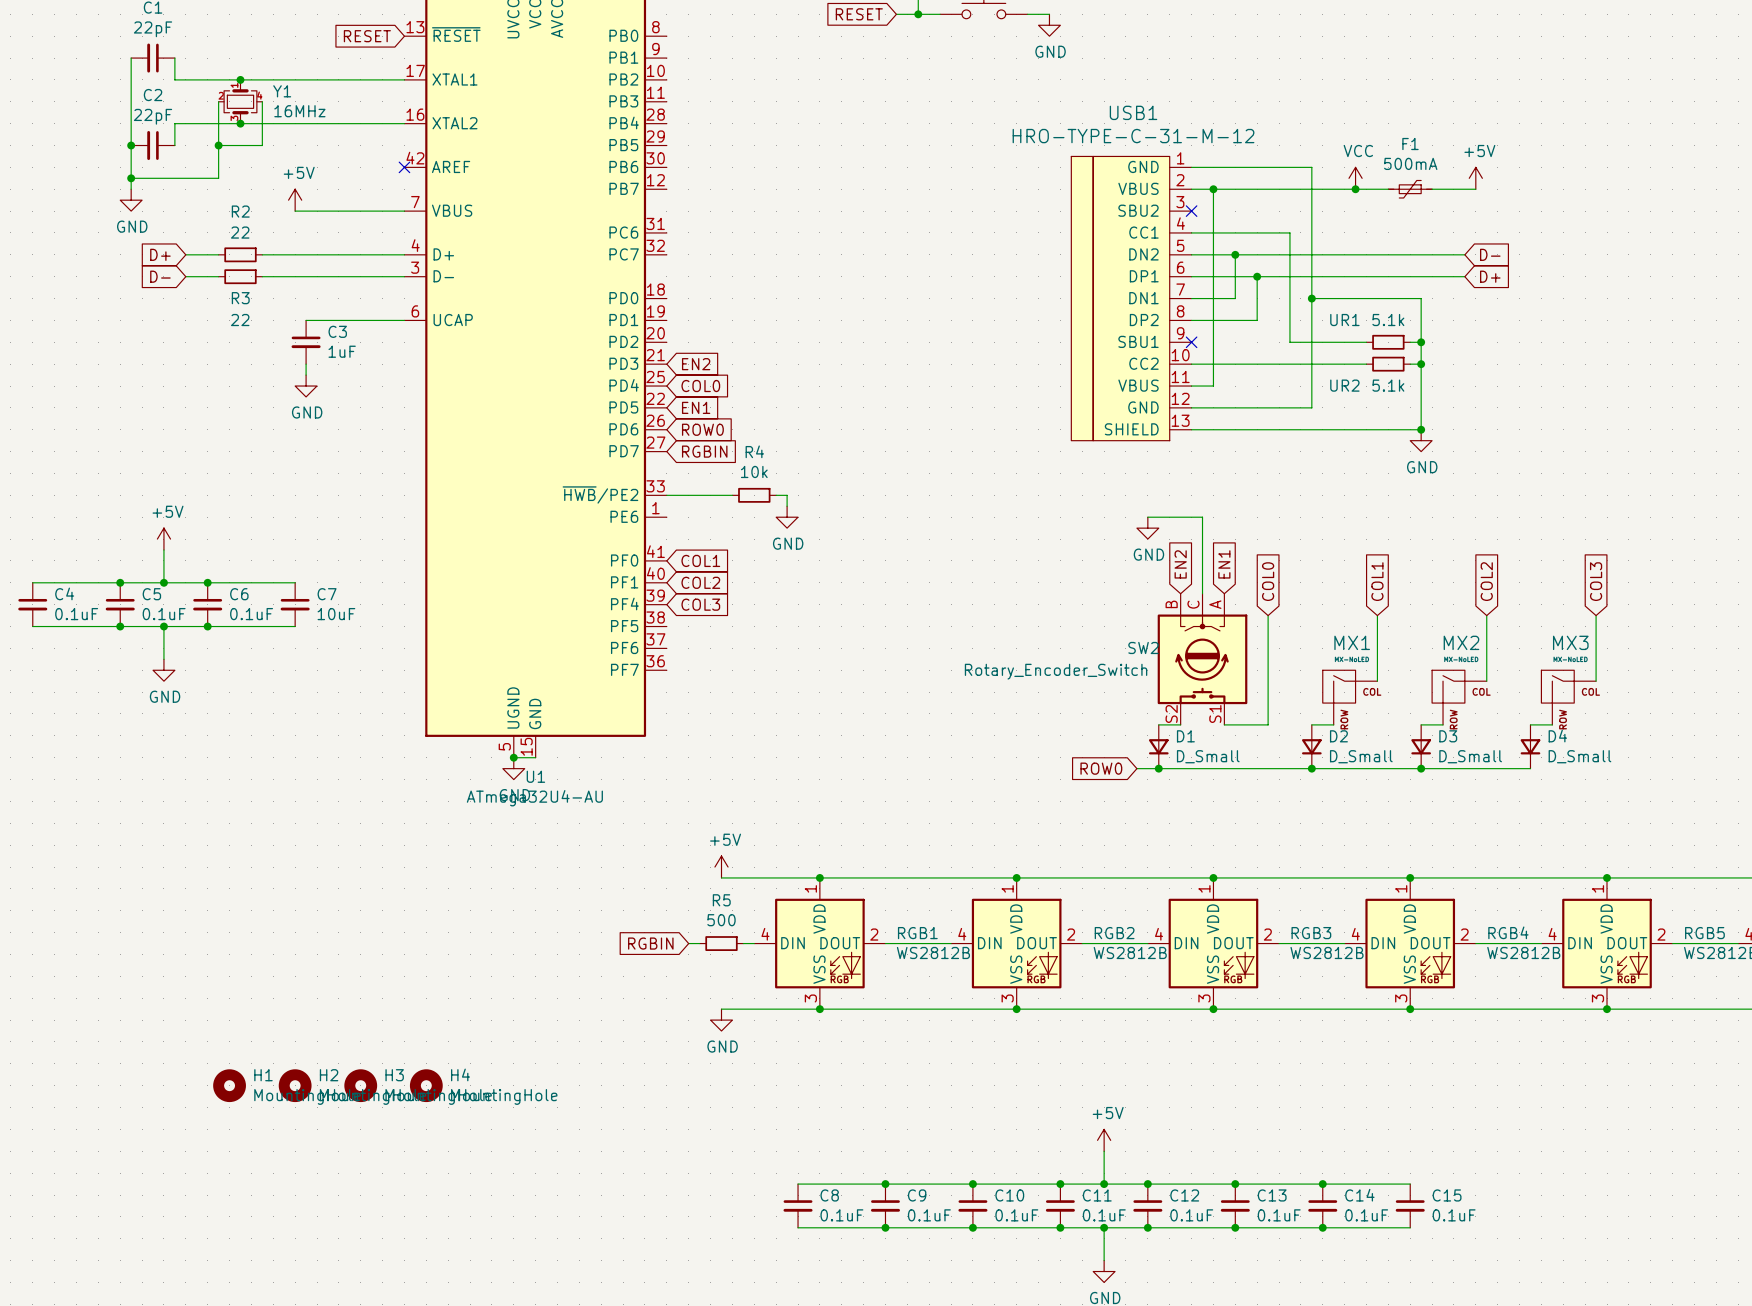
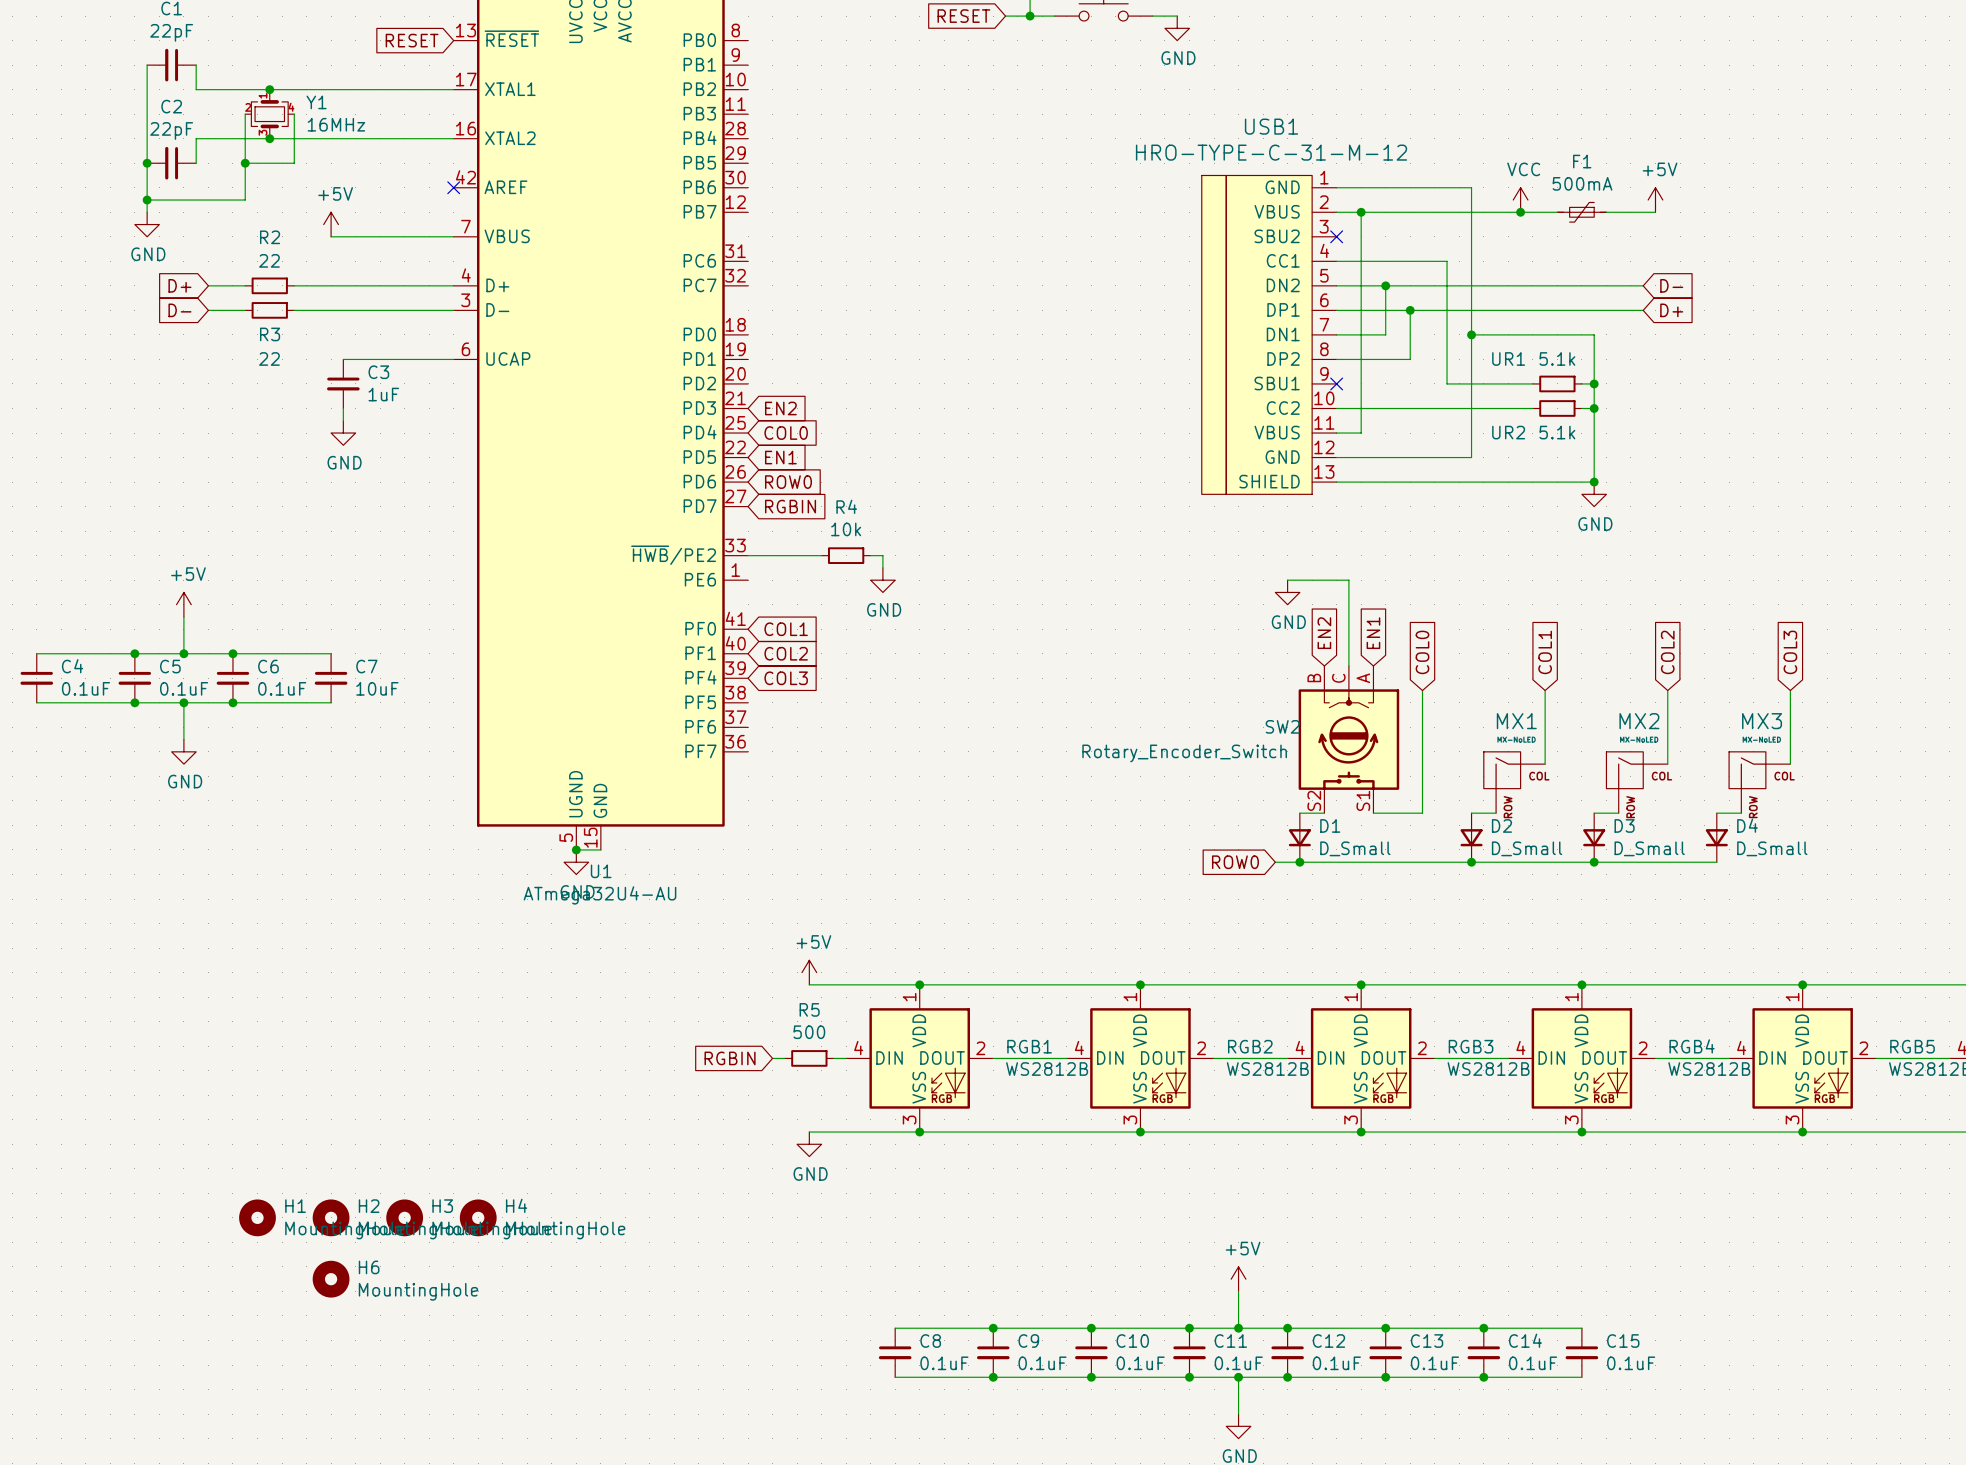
H6: none -> MountingHole (331, 1279)

